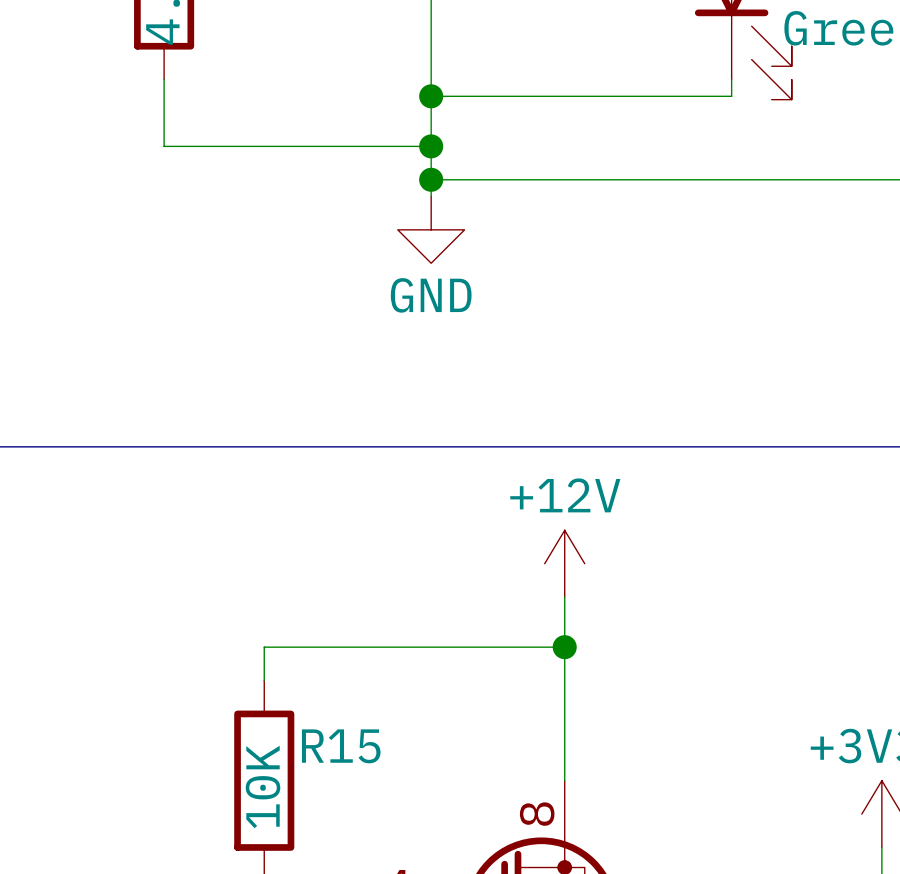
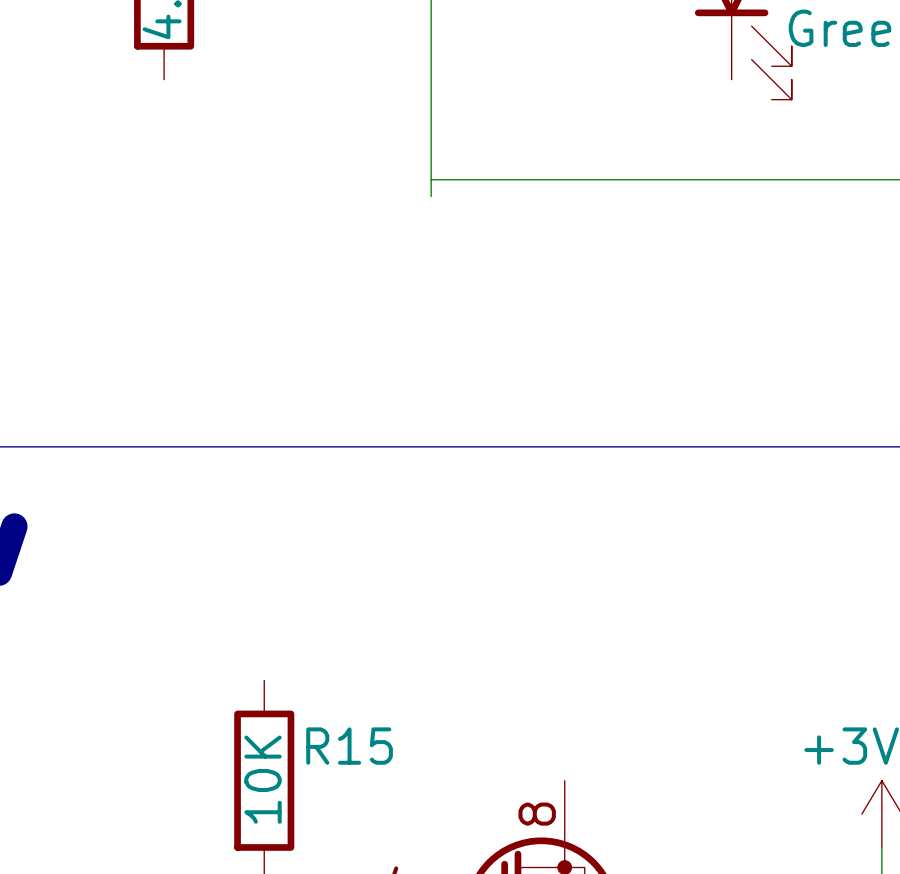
wire: (164, 79) (164, 146) (431, 146) -> none
wire: (731, 79) (731, 96) (431, 96) -> none
junction: (431, 96) -> none
junction: (431, 146) -> none
junction: (431, 179) -> none
power symbol: GND (431, 229) -> none
power symbol: +12V (564, 563) -> none
wire: (564, 597) (564, 780) -> none
wire: (564, 647) (264, 647) (264, 680) -> none
junction: (564, 647) -> none

